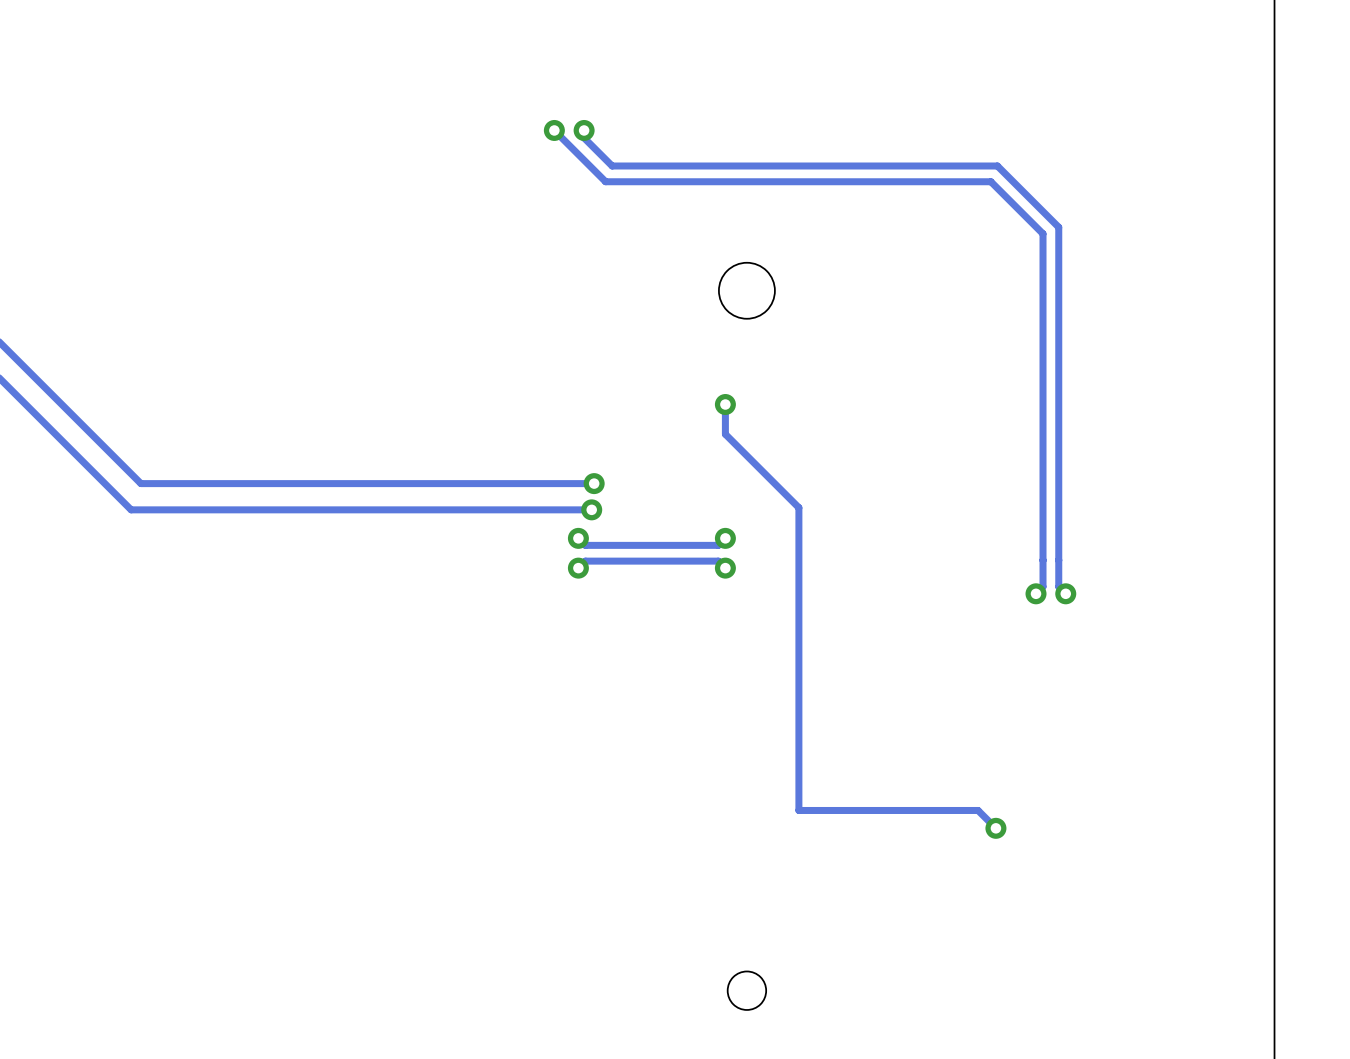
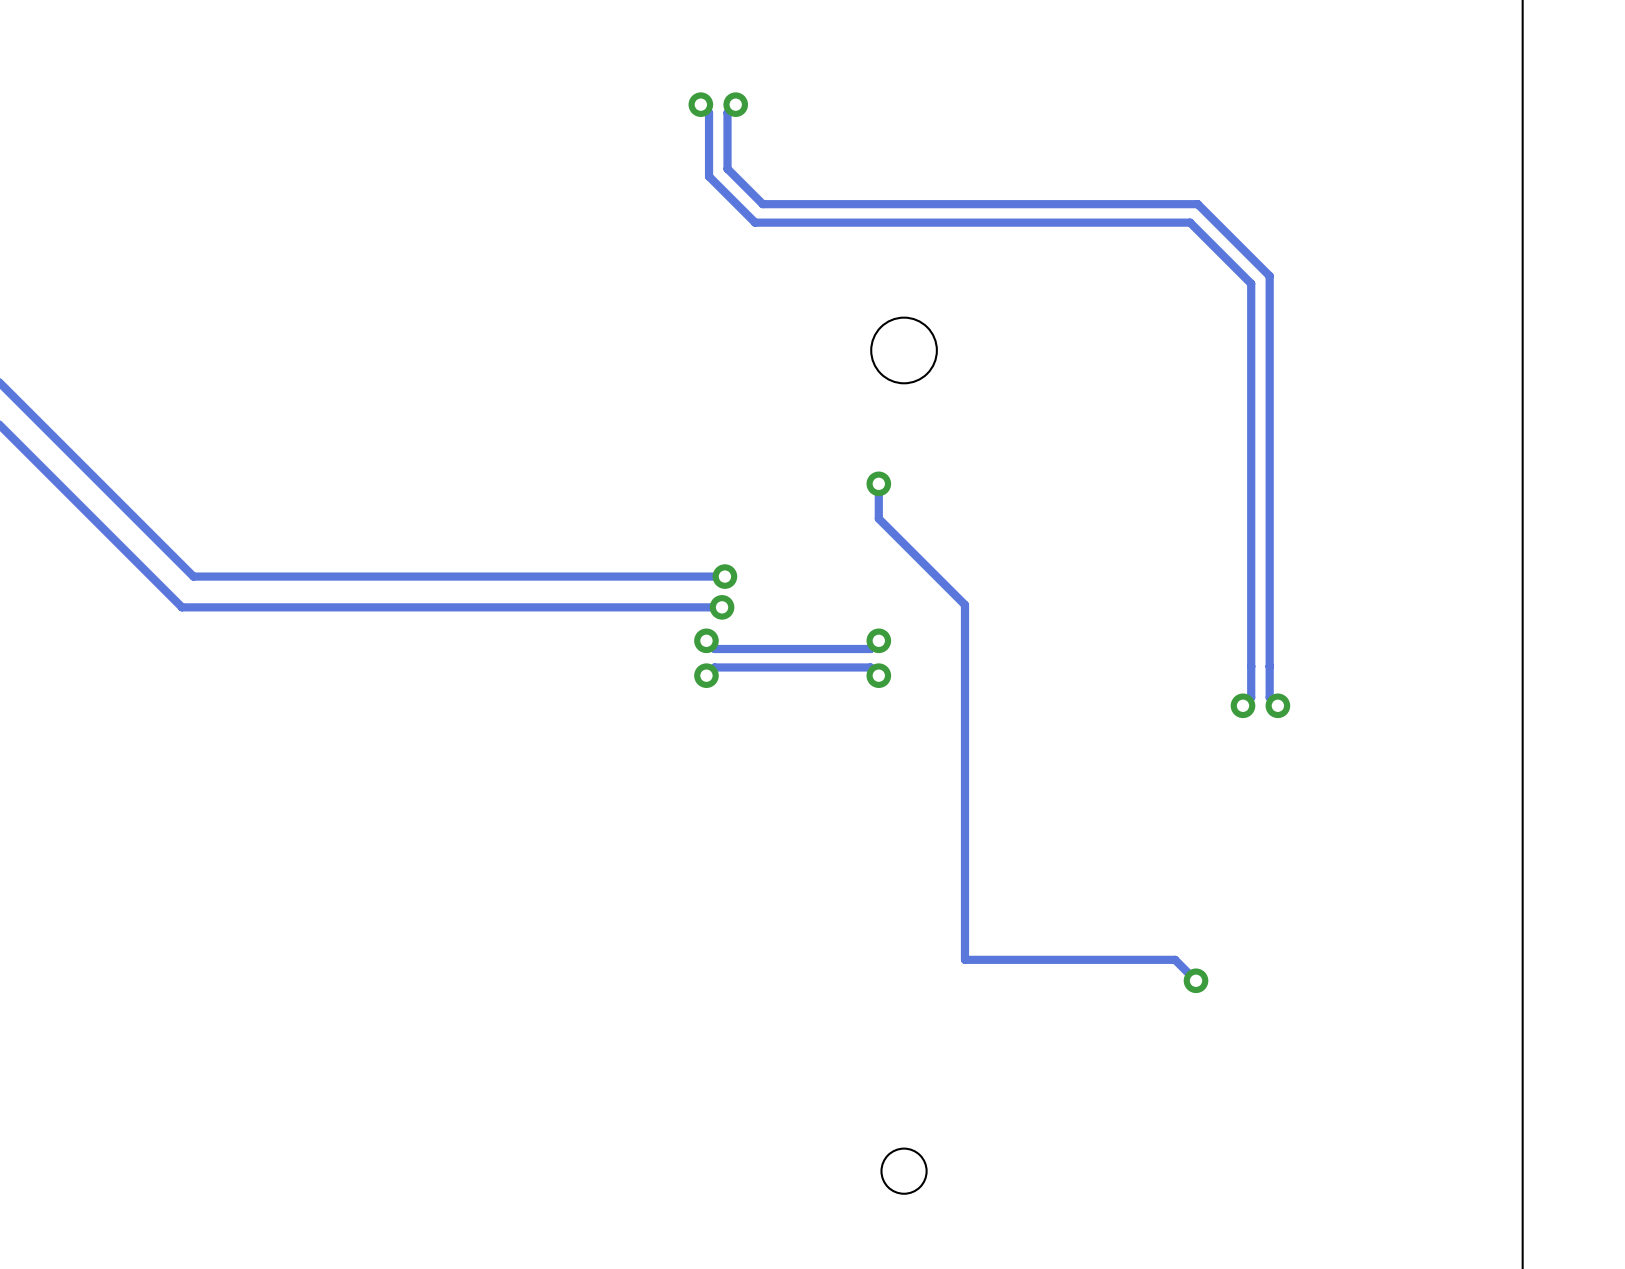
via: none -> (700, 104)
via: none -> (735, 104)
track: (554, 130) (605, 181) (619, 181) -> (700, 104) (709, 112) (709, 176) (755, 222)
via: (554, 130) -> none
track: (584, 130) (584, 137) (612, 165) (626, 165) -> (735, 104) (727, 112) (727, 168) (762, 204)
via: (584, 130) -> none

